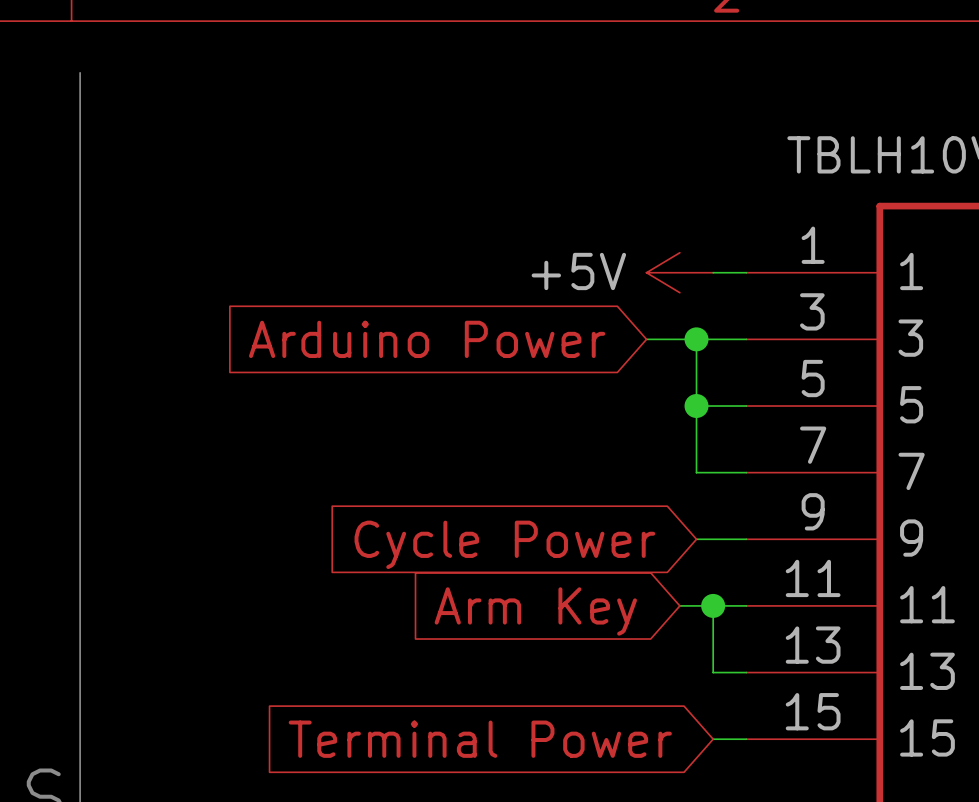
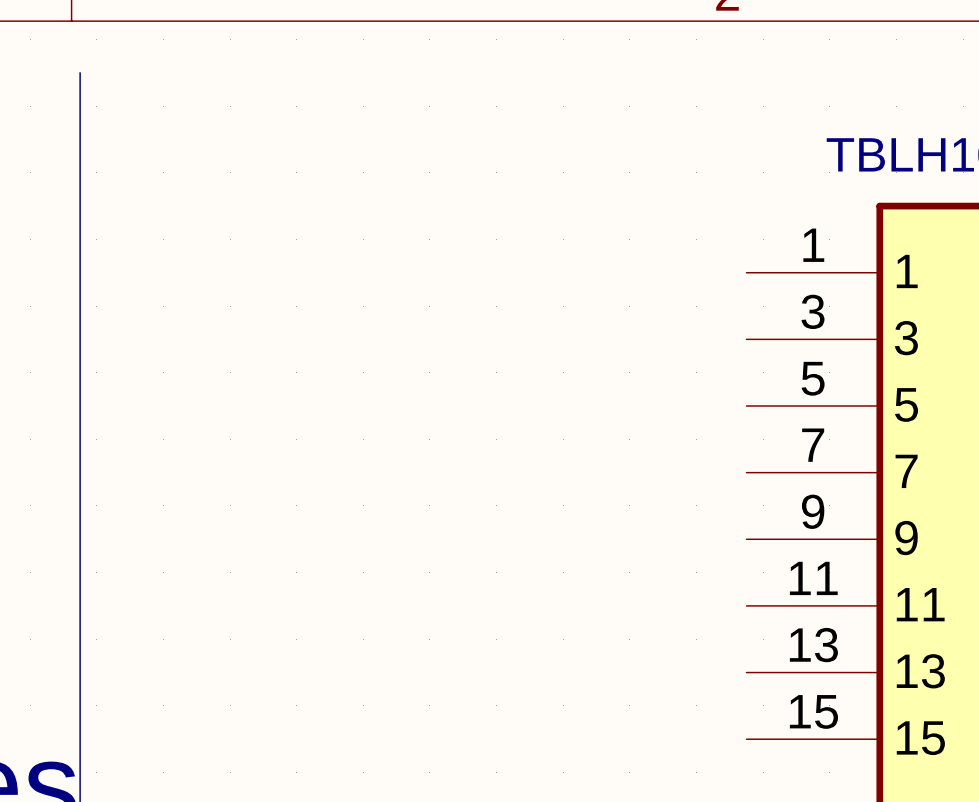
power symbol: +5V (679, 272) -> none
wire: (713, 272) (746, 272) -> none
global label: Arduino Power (427, 339) -> none
wire: (646, 339) (746, 339) -> none
wire: (696, 339) (696, 472) (746, 472) -> none
junction: (696, 339) -> none
wire: (696, 406) (746, 406) -> none
junction: (696, 406) -> none
wire: (696, 539) (746, 539) -> none
global label: Cycle Power (504, 544) -> none
wire: (679, 605) (746, 605) -> none
wire: (713, 605) (713, 672) (746, 672) -> none
junction: (713, 605) -> none
global label: Arm Key (535, 611) -> none
global label: Terminal Power (480, 739) -> none
wire: (713, 739) (746, 739) -> none

